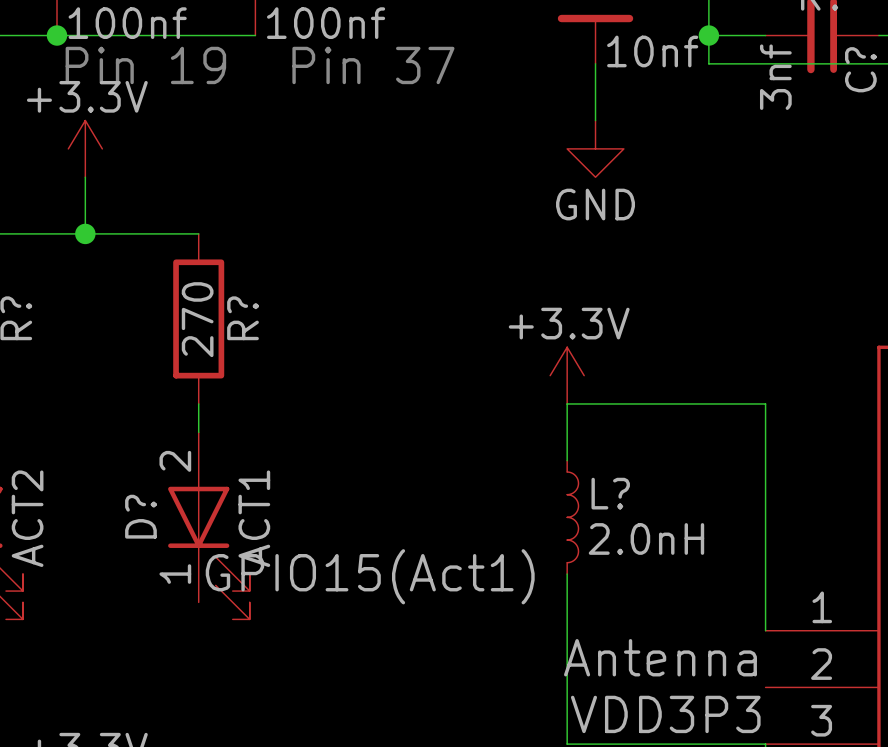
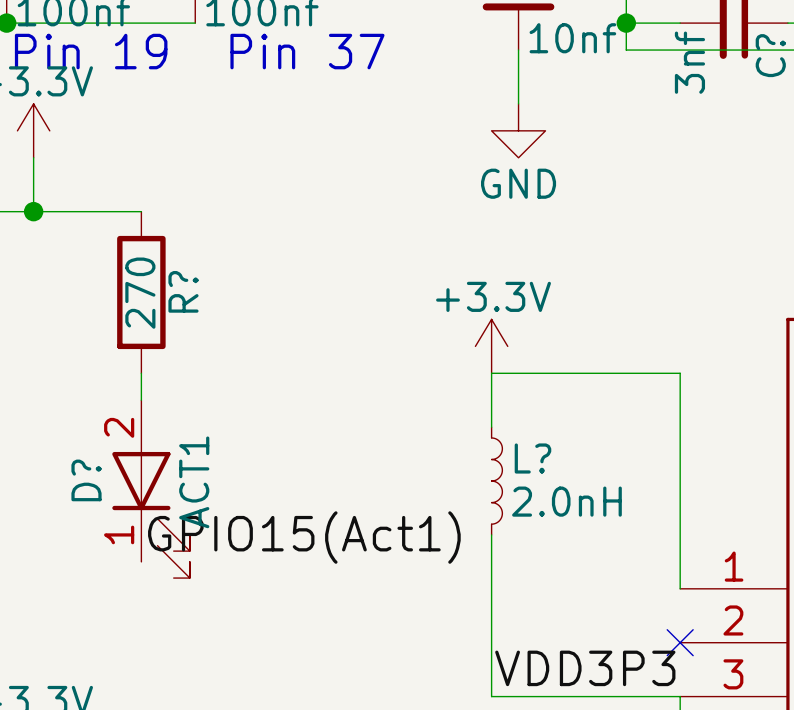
label: Antenna (660, 657) -> none
no-connect mark: none -> (680, 642)

